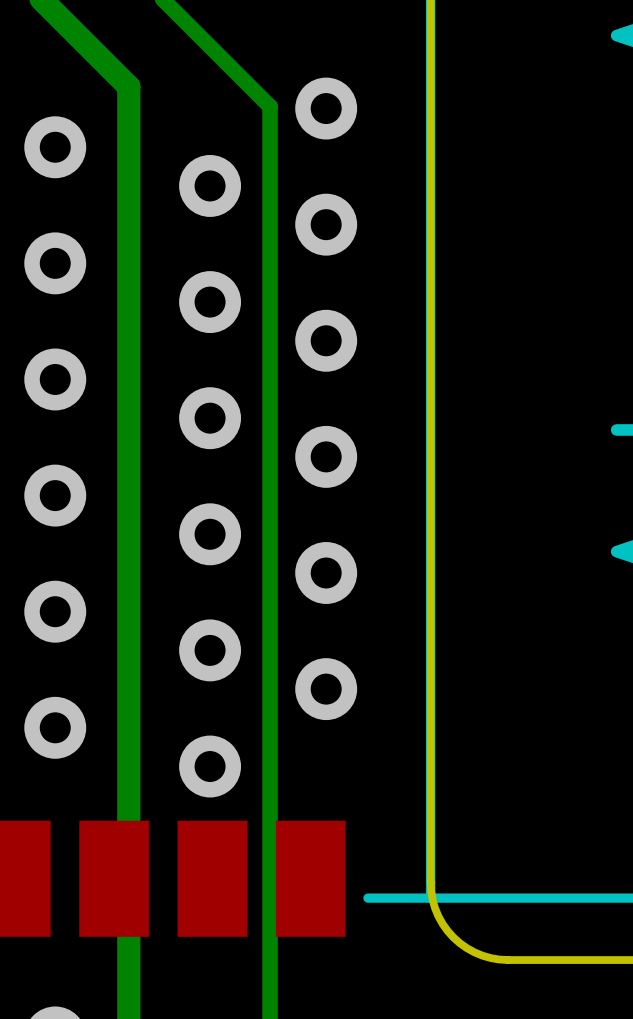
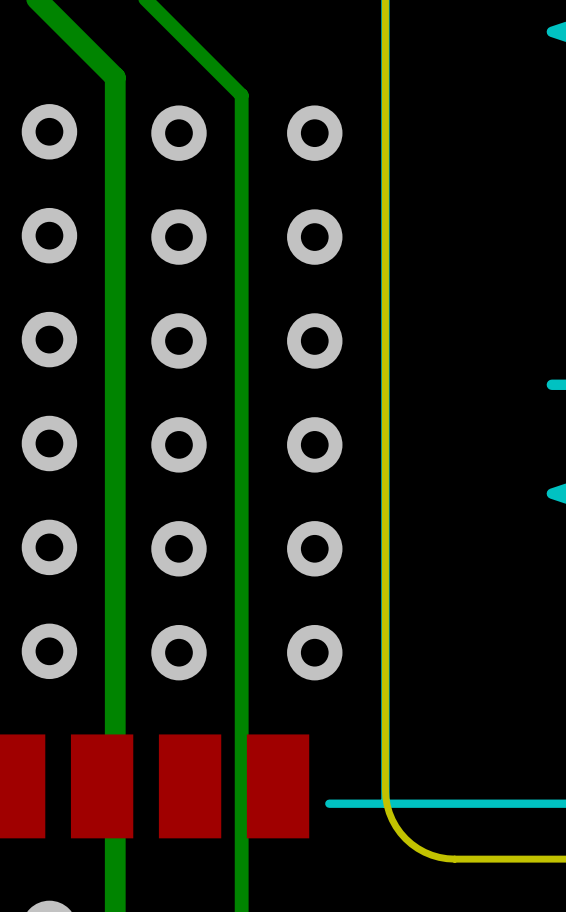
via position: (326, 108) -> (314, 133)
via position: (210, 185) -> (178, 133)
via position: (326, 224) -> (314, 237)
via position: (210, 302) -> (178, 237)
via position: (326, 340) -> (314, 340)
via position: (210, 418) -> (178, 340)
via position: (326, 456) -> (314, 444)
via position: (210, 534) -> (178, 444)
via position: (326, 573) -> (314, 548)
via position: (210, 650) -> (178, 548)
via position: (326, 689) -> (314, 652)
via position: (210, 766) -> (178, 652)

